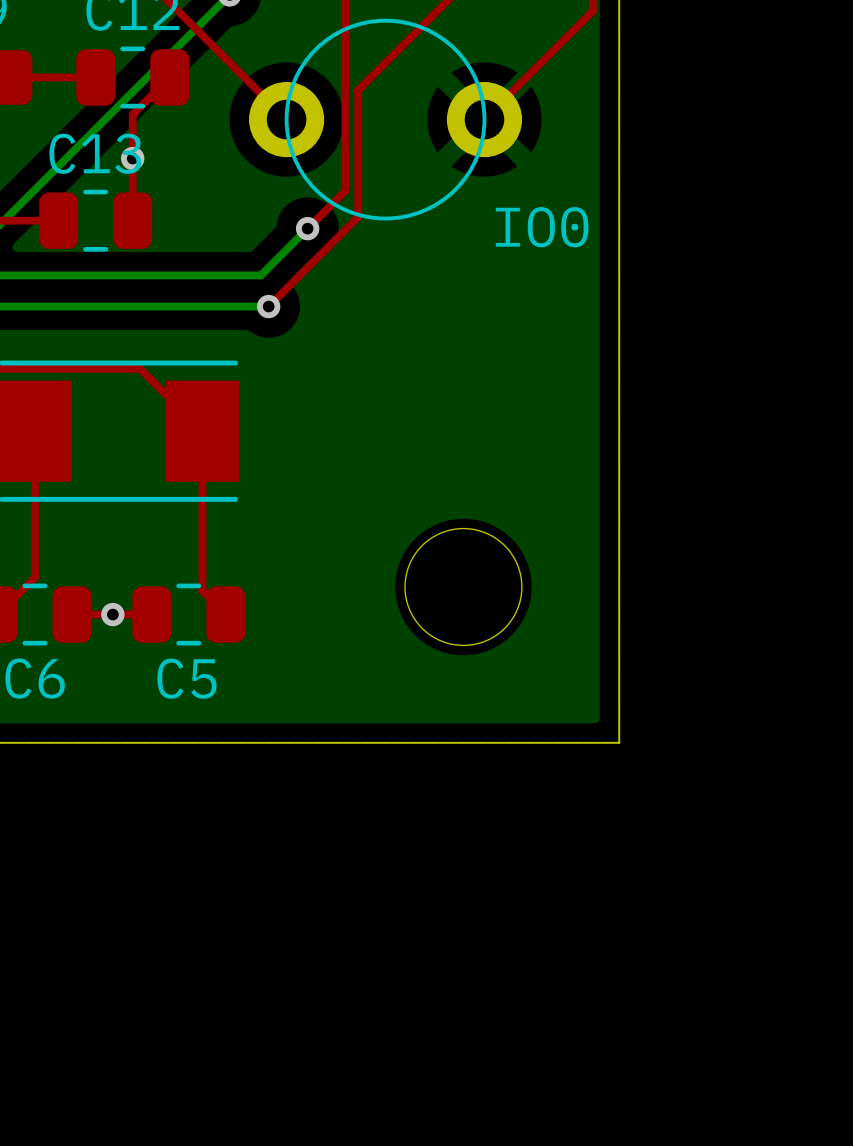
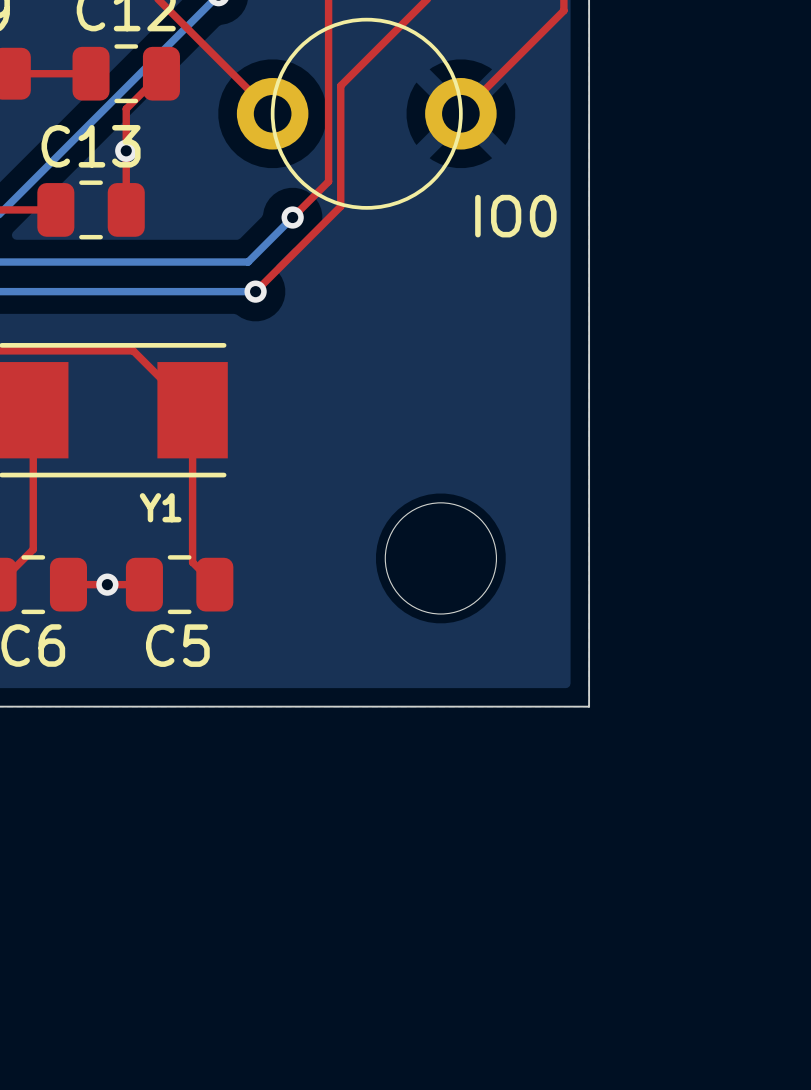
Y1 name: none -> Y1 (160, 507)

